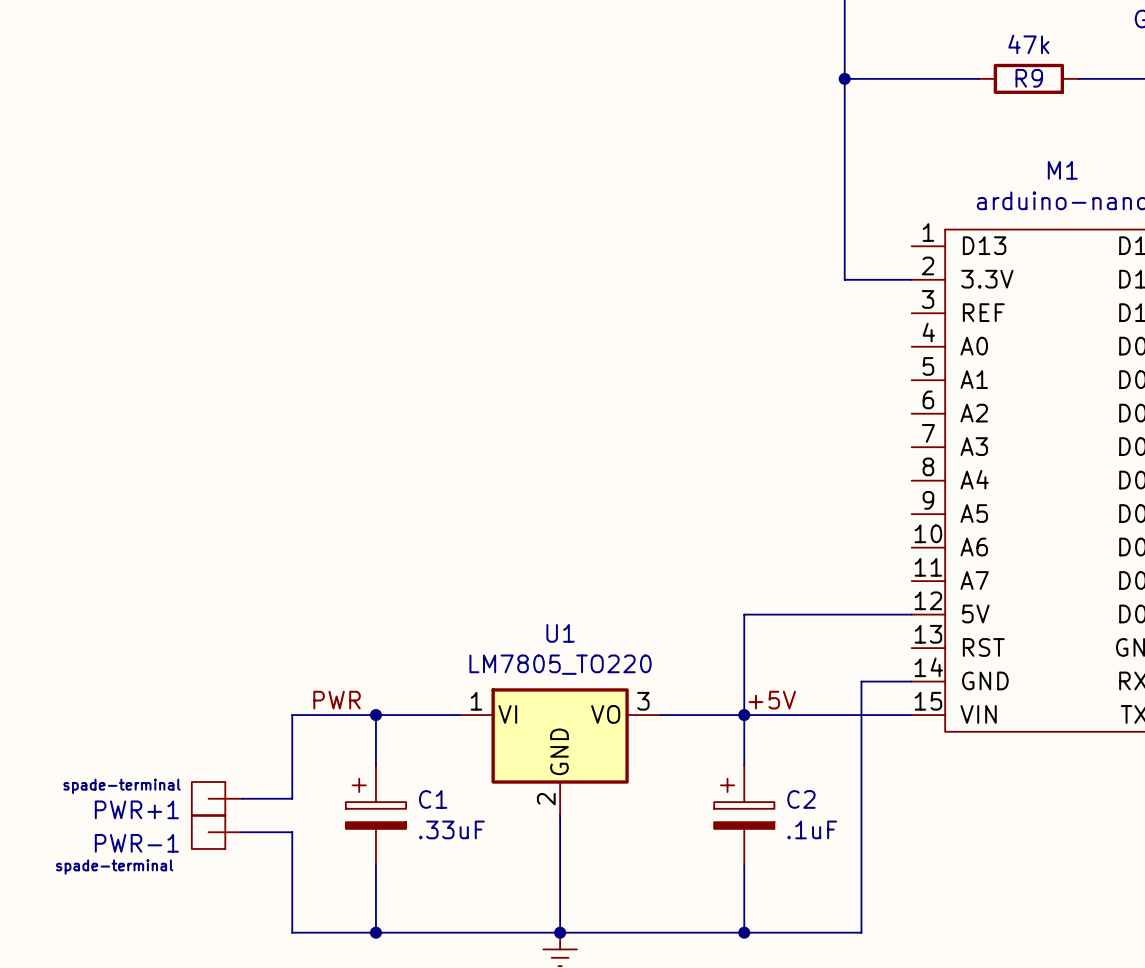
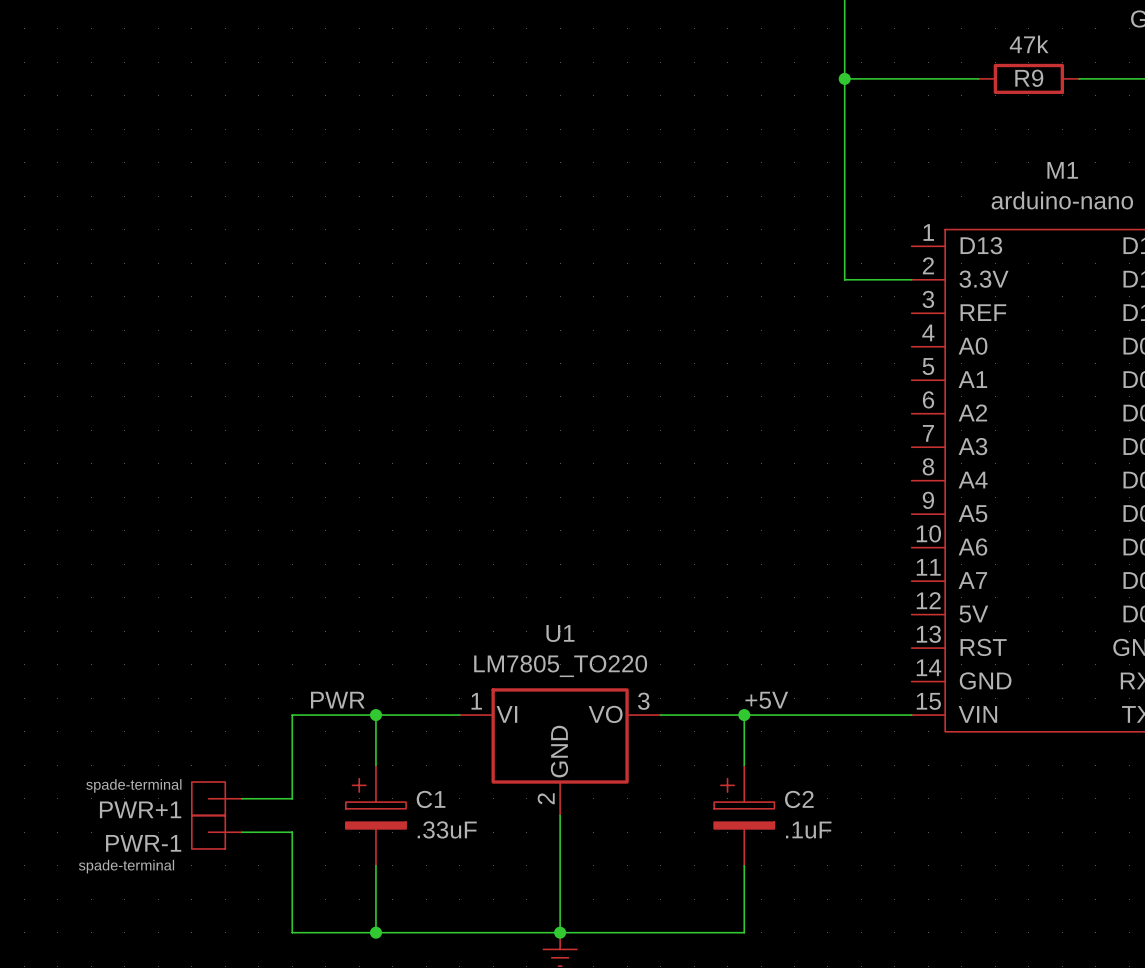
wire: (911, 614) (744, 614) (744, 715) -> none
wire: (911, 681) (861, 681) (861, 932) (744, 932) -> none
junction: (744, 932) -> none

